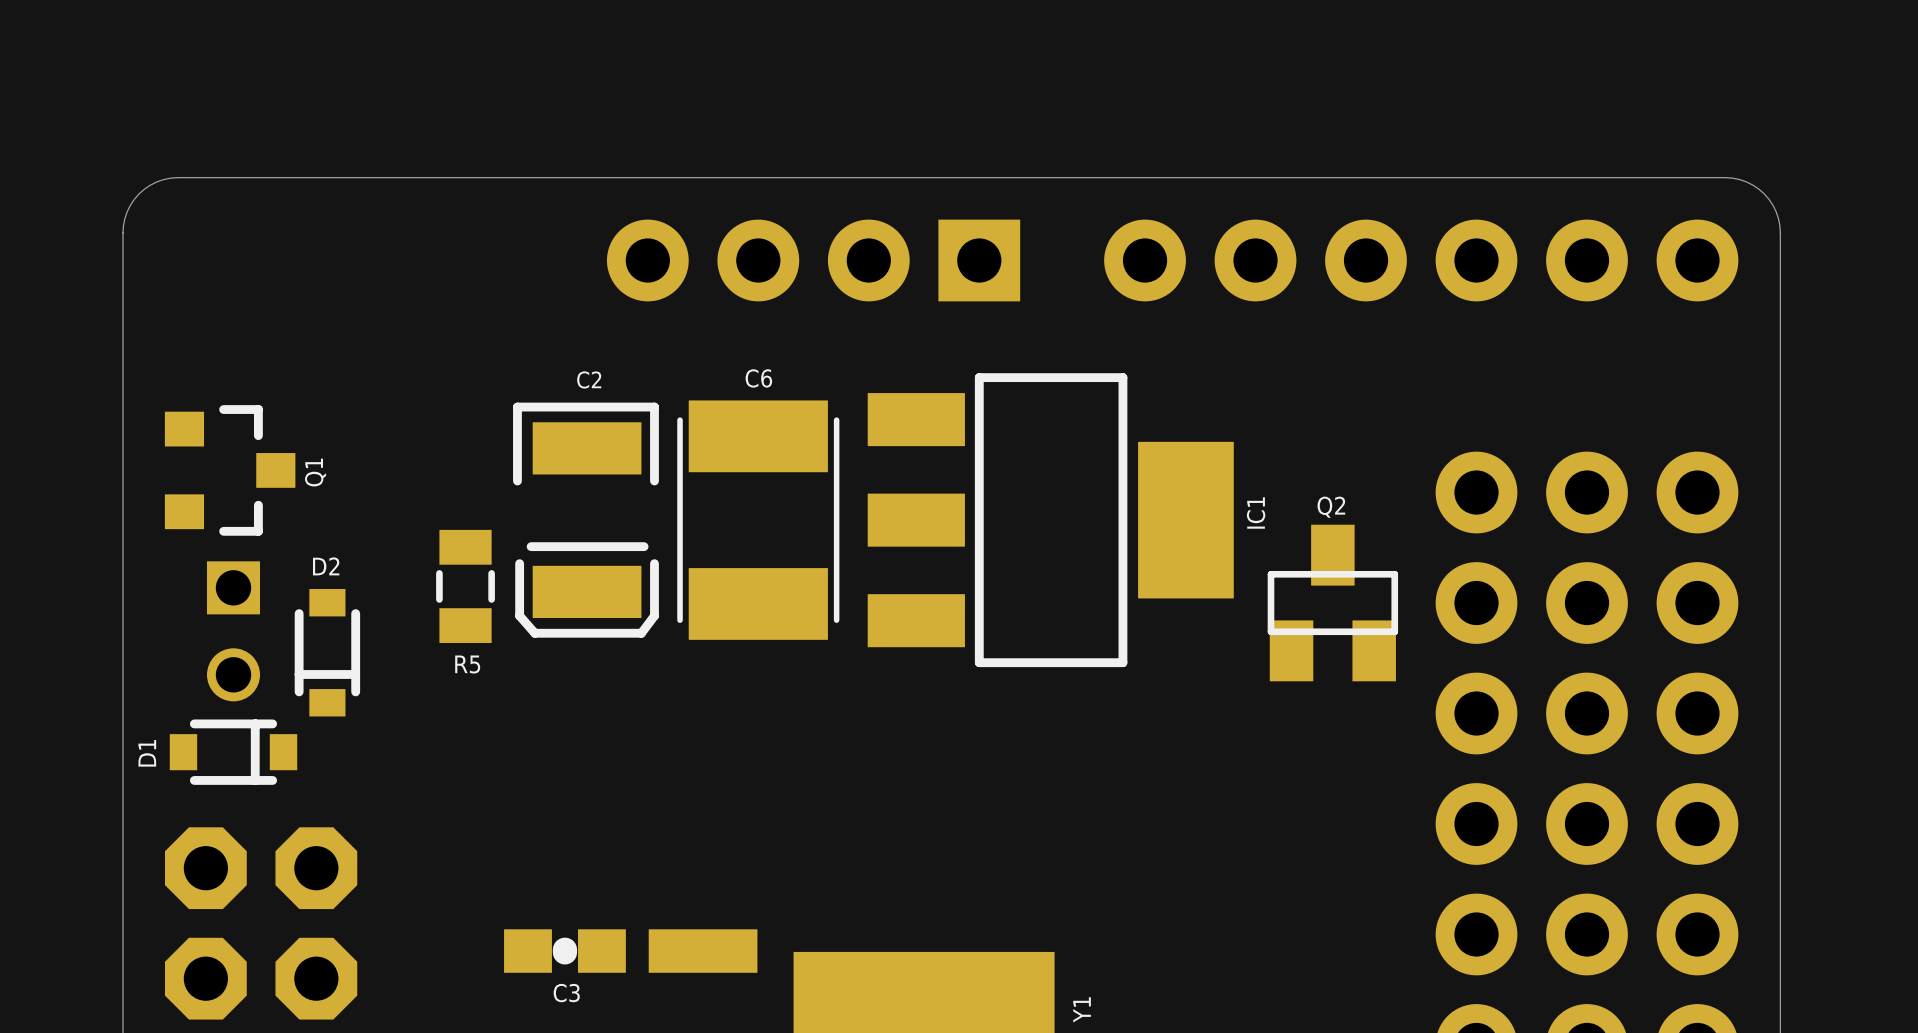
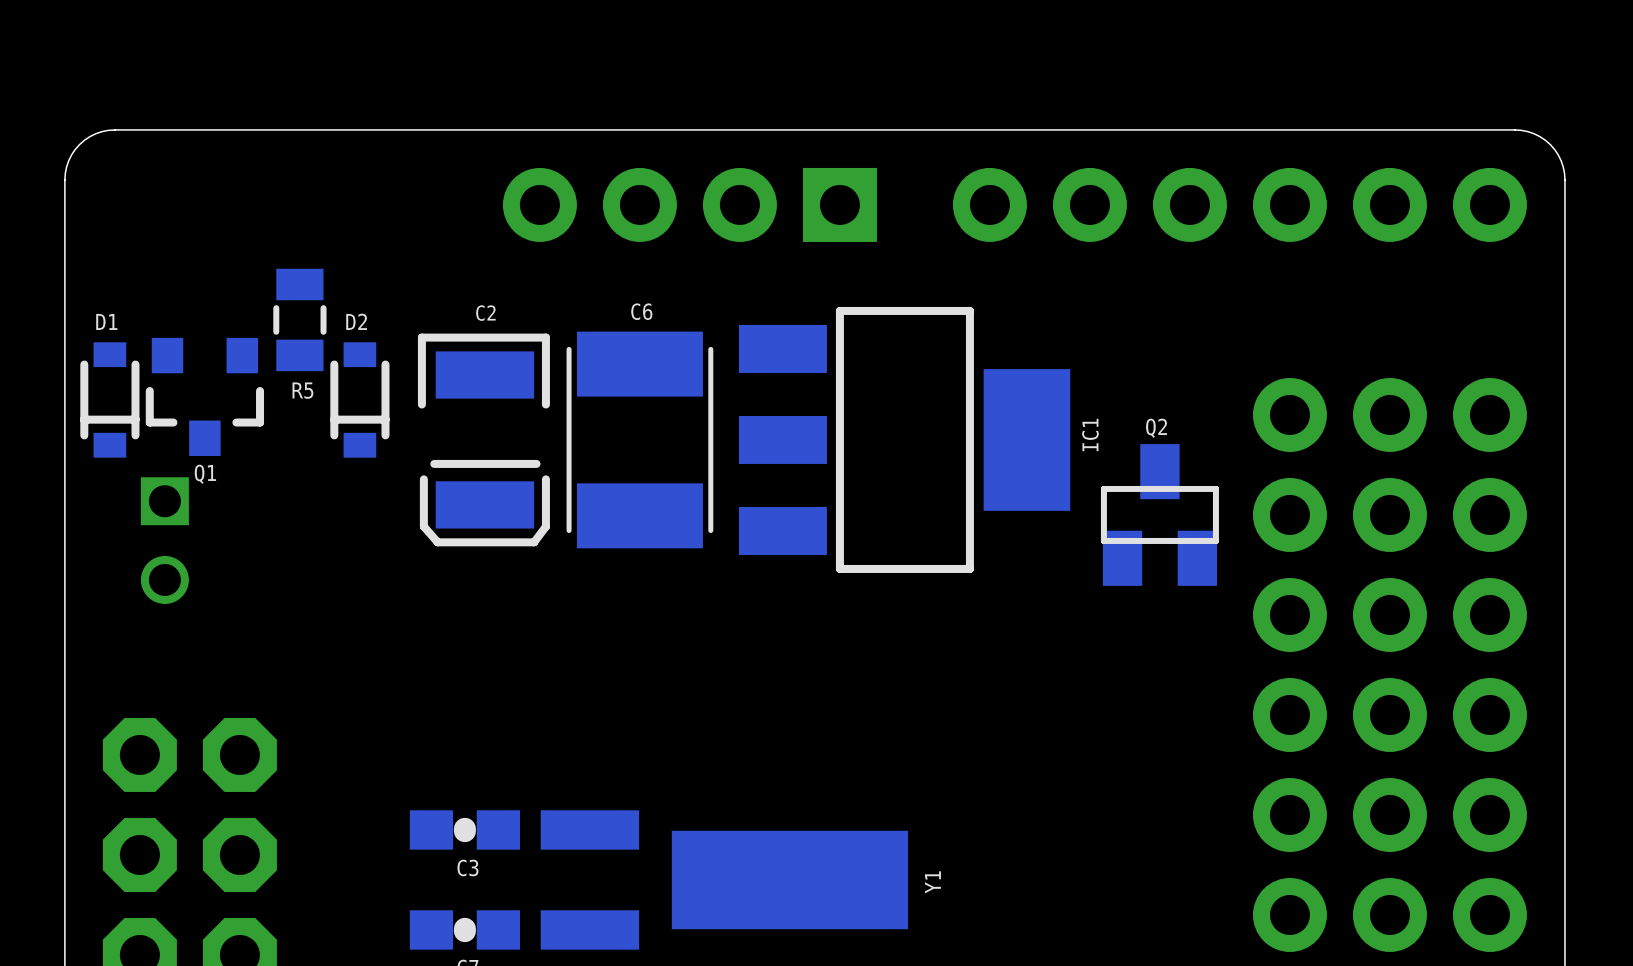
Q1 rotation: 0° (230, 470) -> 90° clockwise (204, 396)
R5 position: (465, 586) -> (299, 319)
D2 position: (327, 652) -> (359, 399)
D1 rotation: 0° (233, 752) -> 90° clockwise (109, 399)
D1 position: (233, 752) -> (109, 399)

